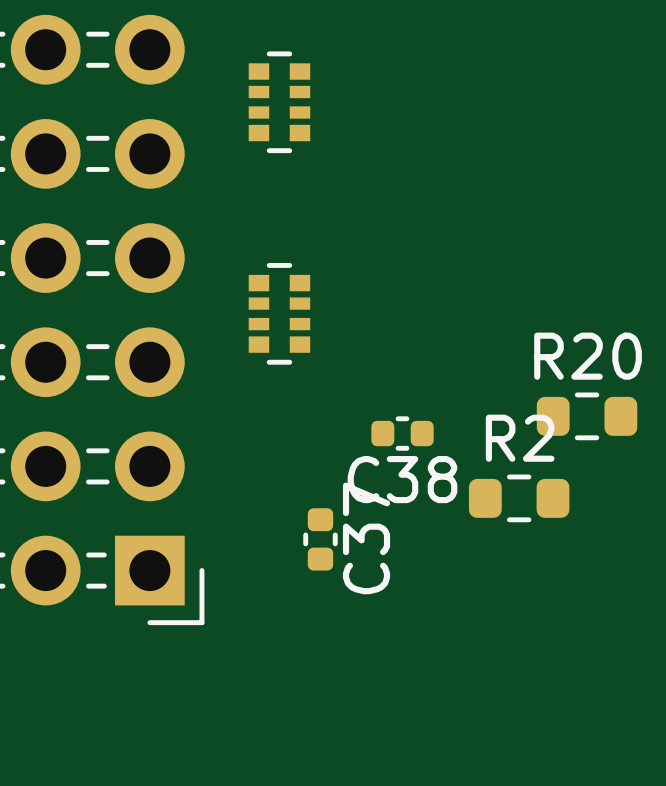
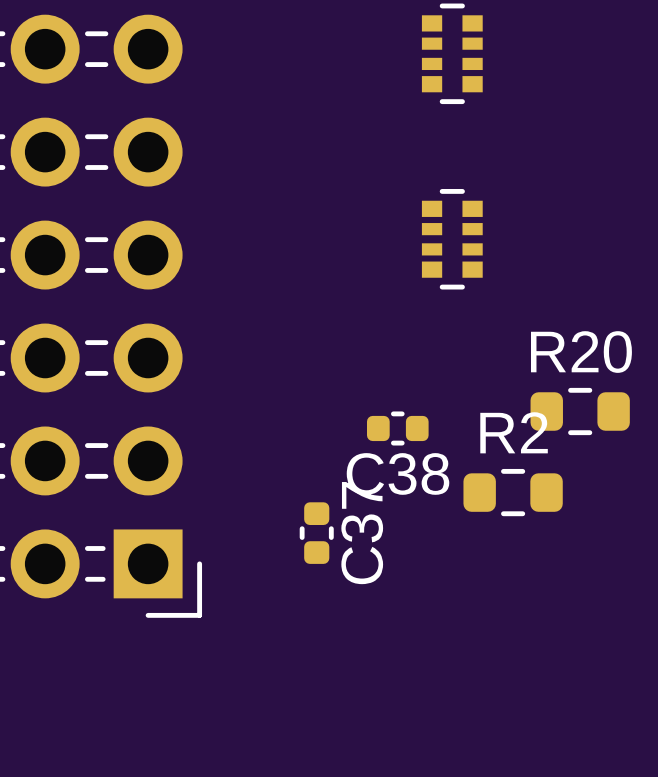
part: none -> (452, 53)
part: (279, 102) -> none
part: none -> (452, 239)
part: (279, 313) -> none

